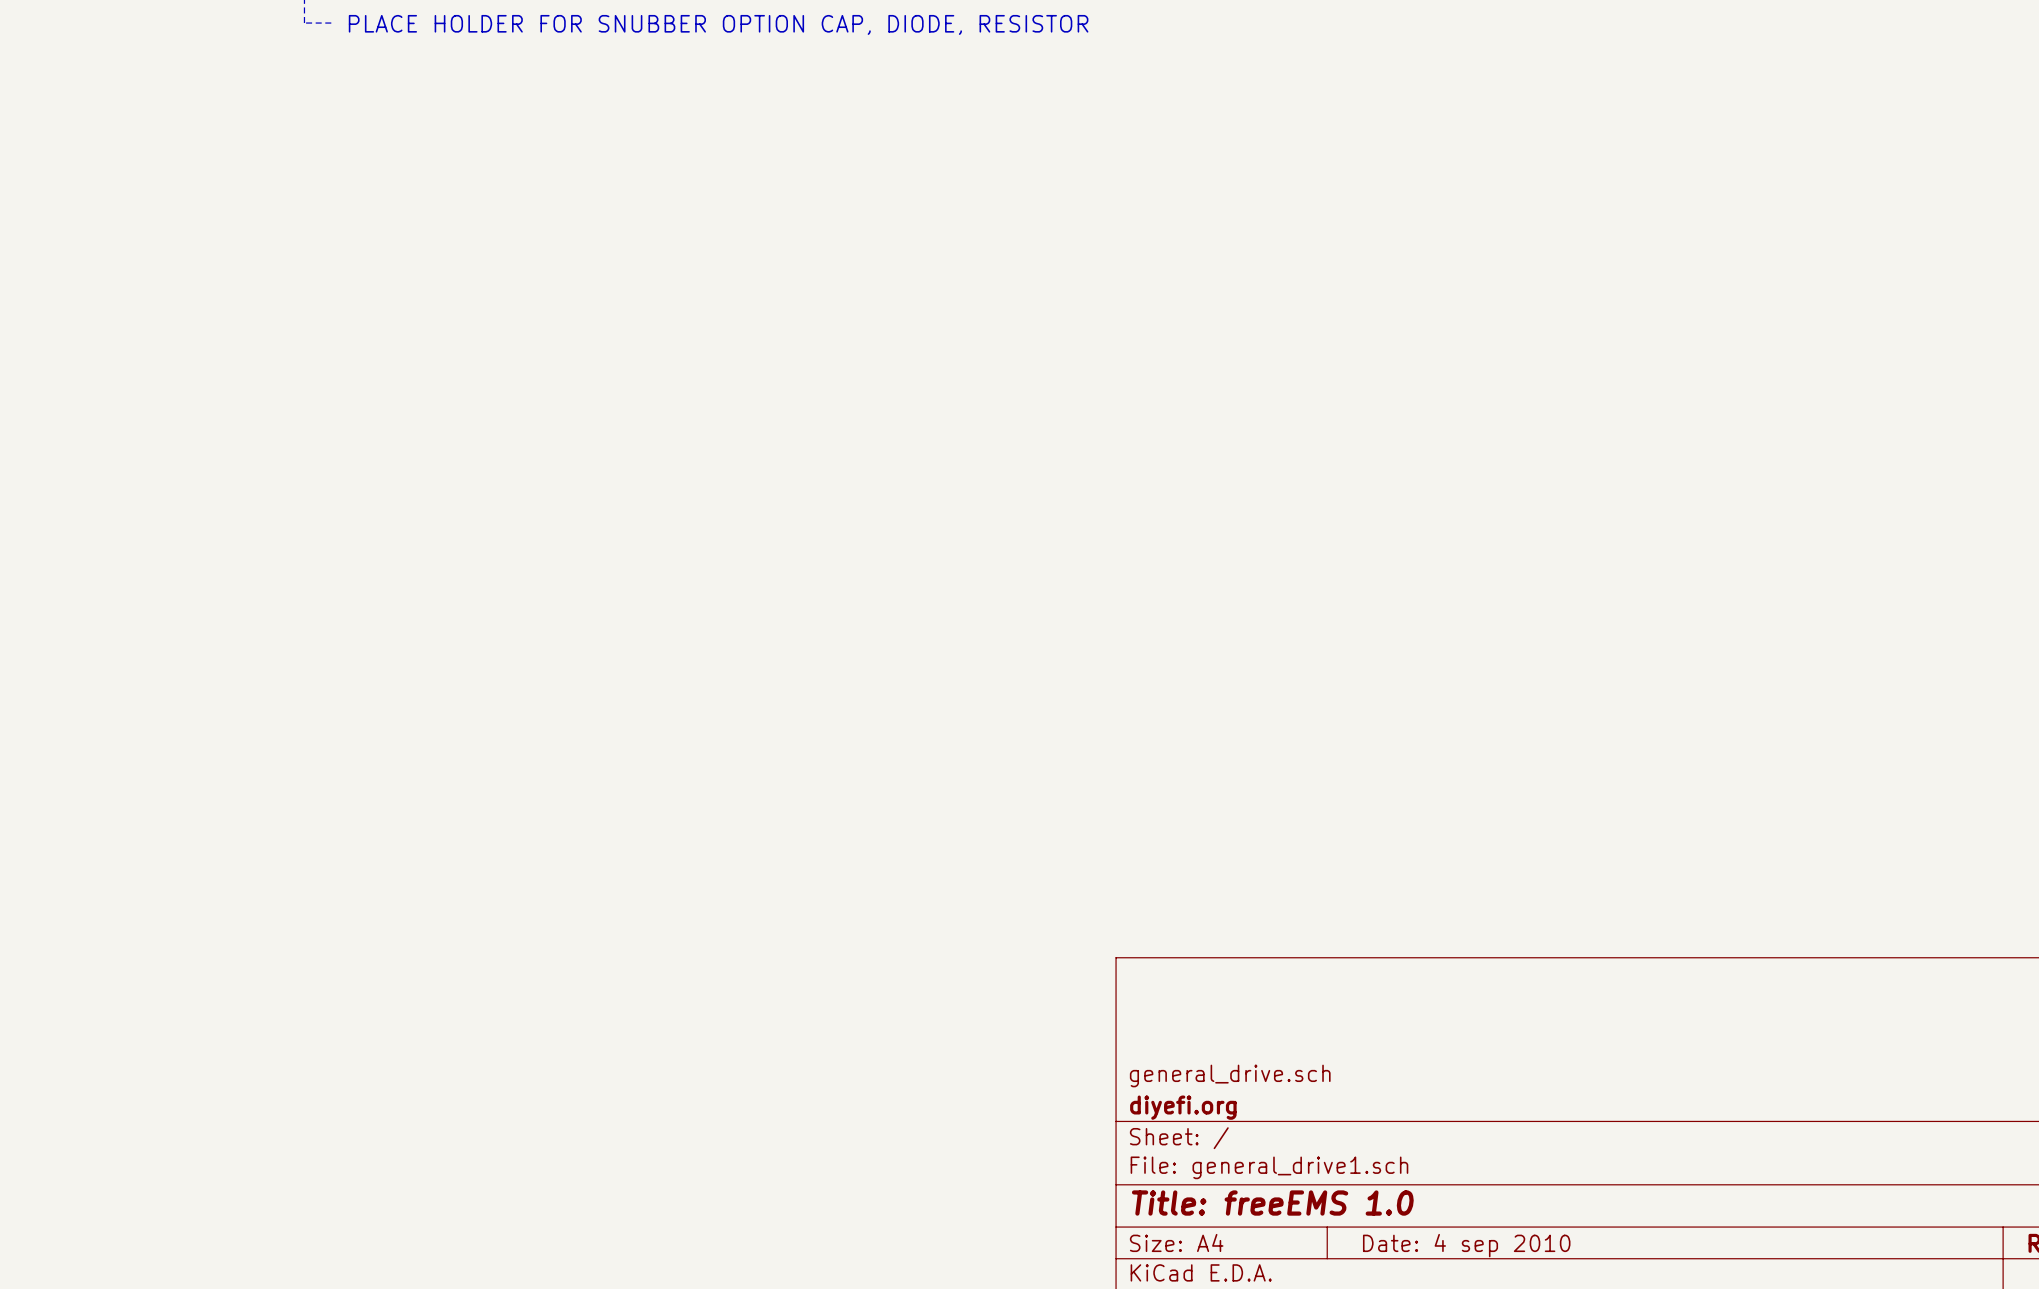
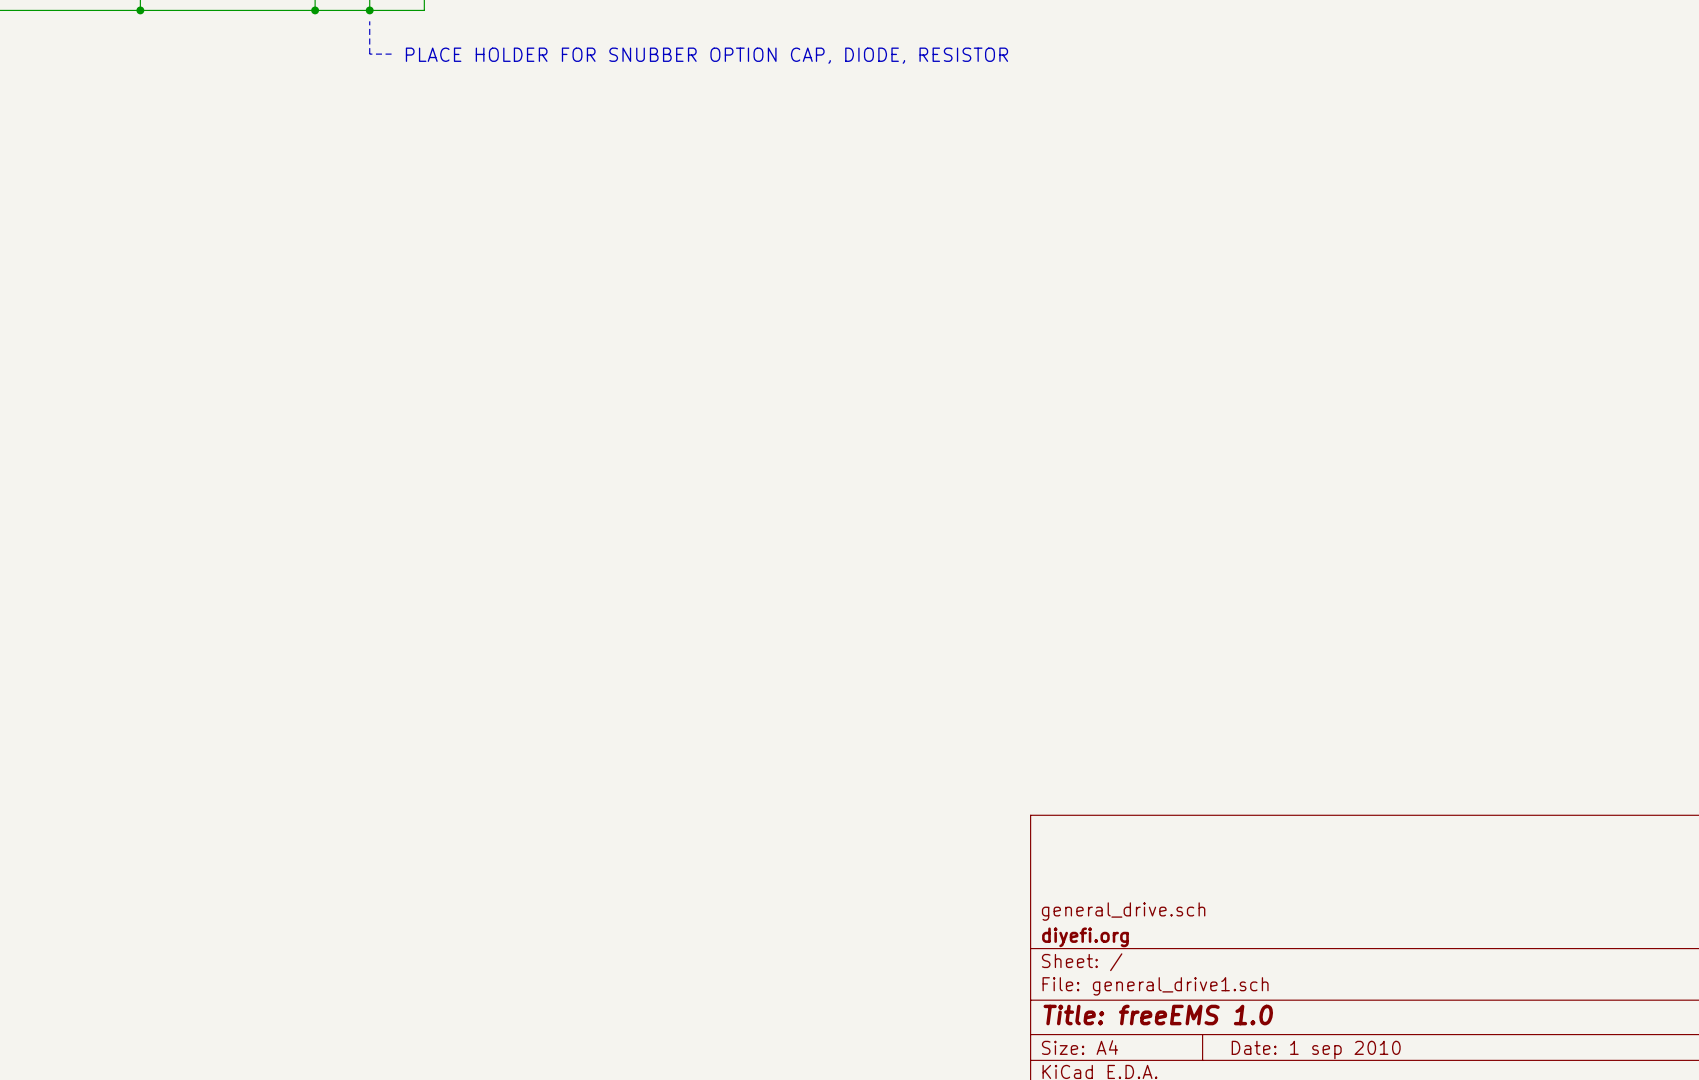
title block: Date: 4 sep 2010 (1466, 1245) -> Date: 1 sep 2010 (1316, 1050)

